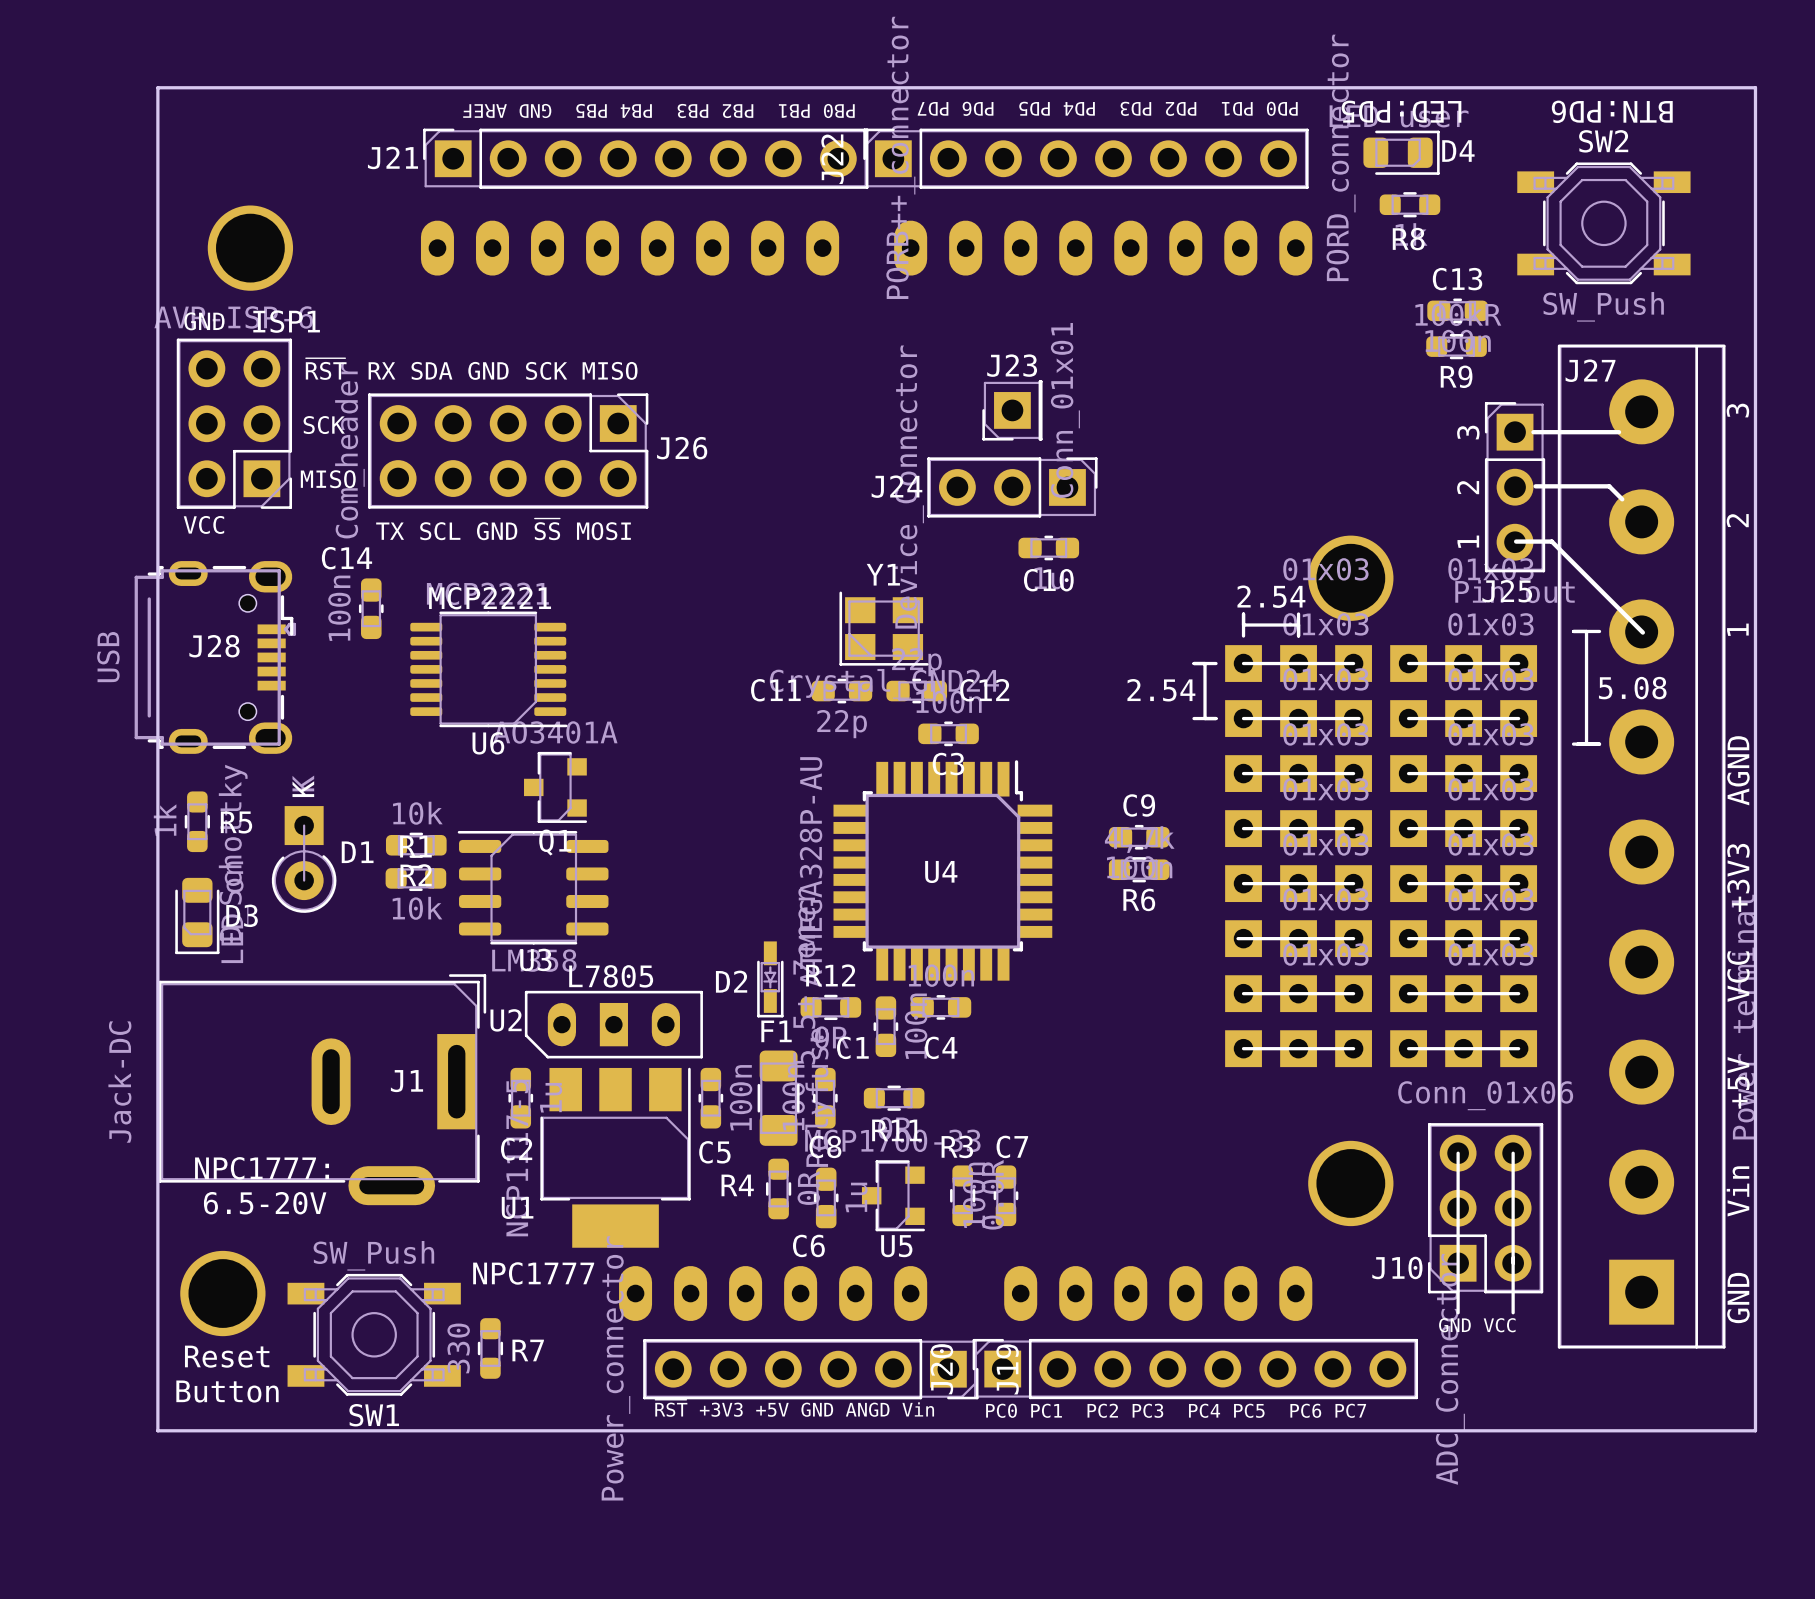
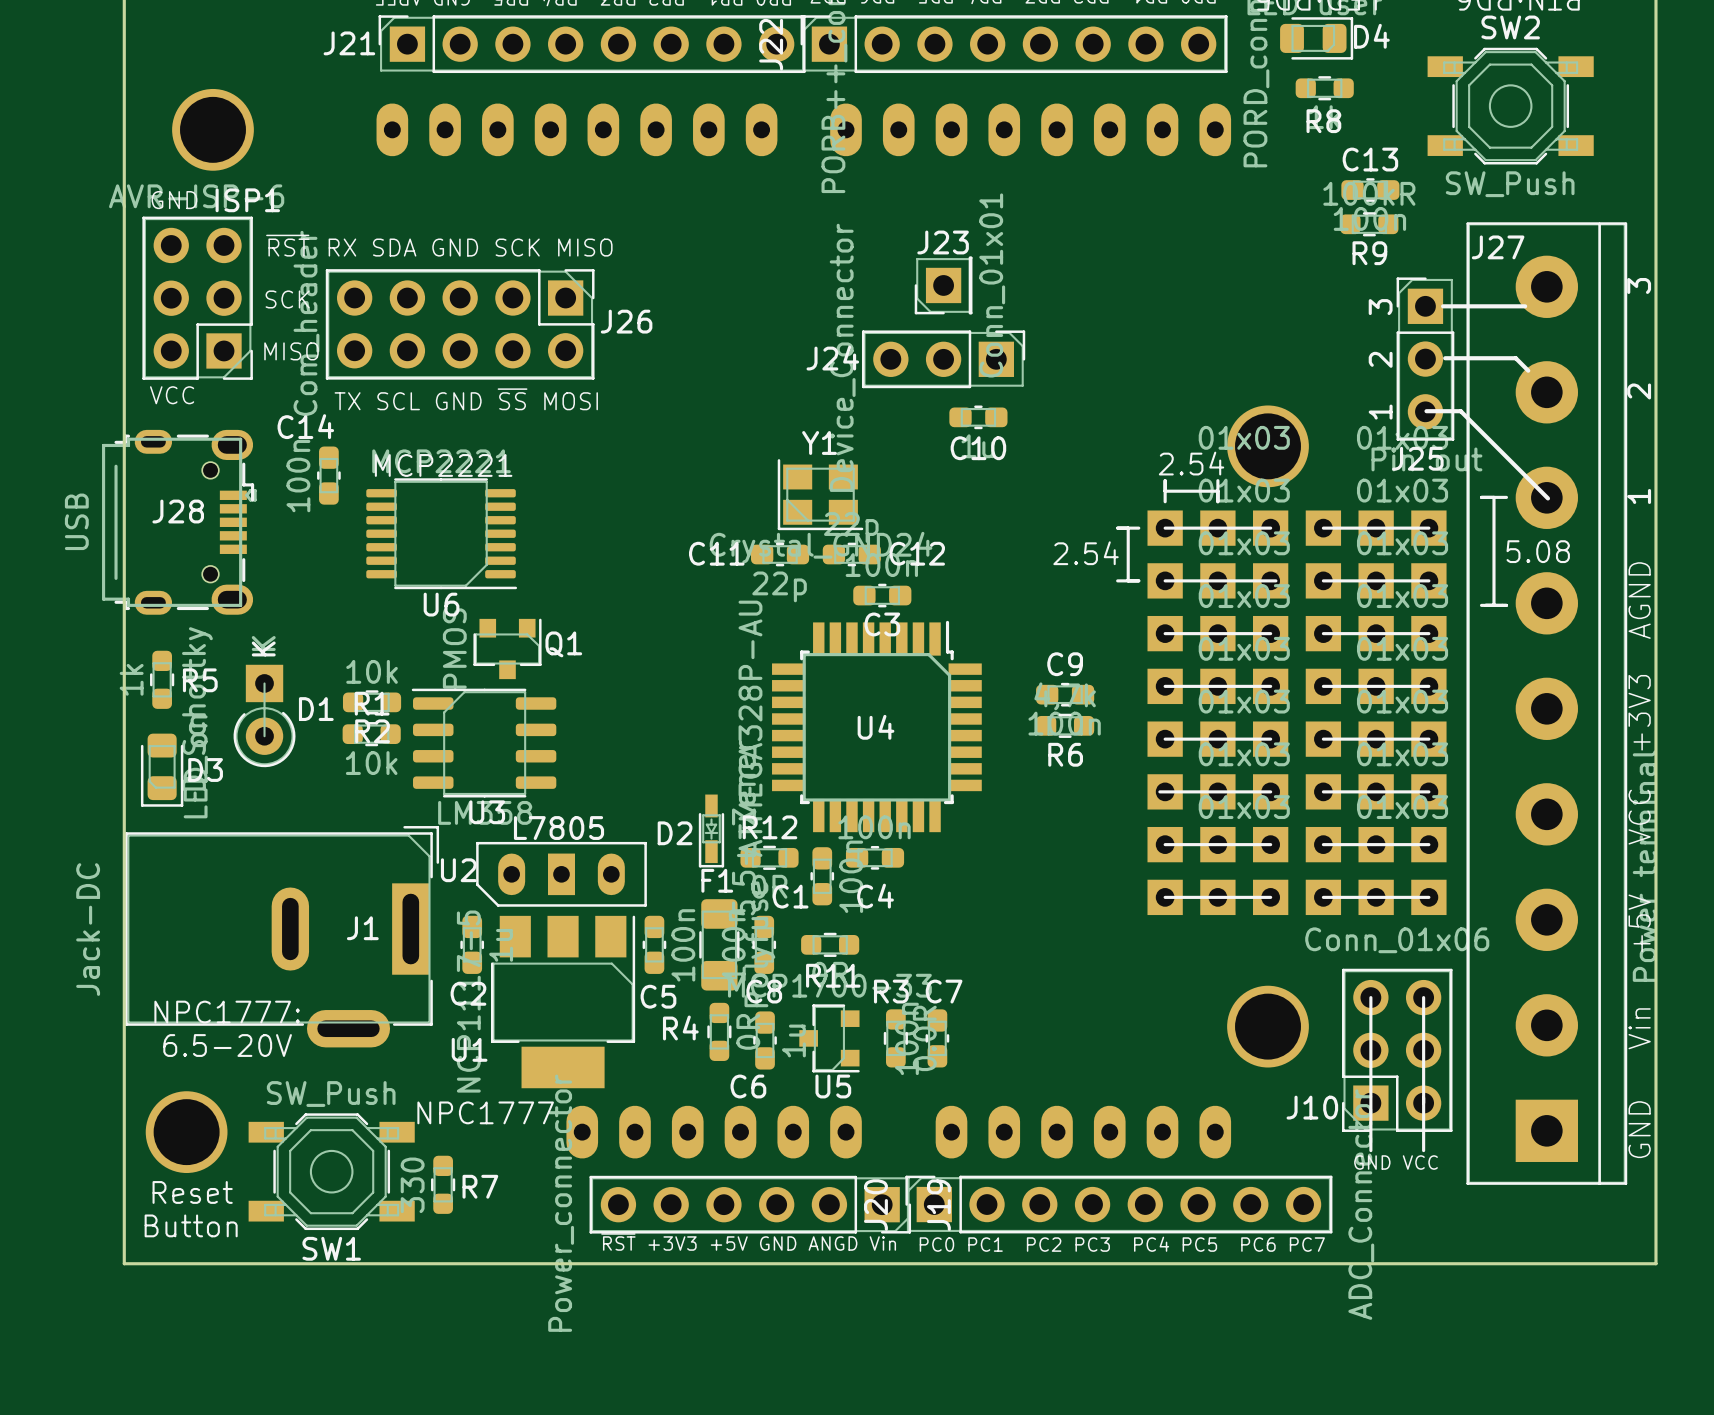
Q1 value: AO3401A (555, 732) -> PMOS (454, 648)
Q1 rotation: 0° (555, 787) -> 90° counterclockwise (507, 648)

